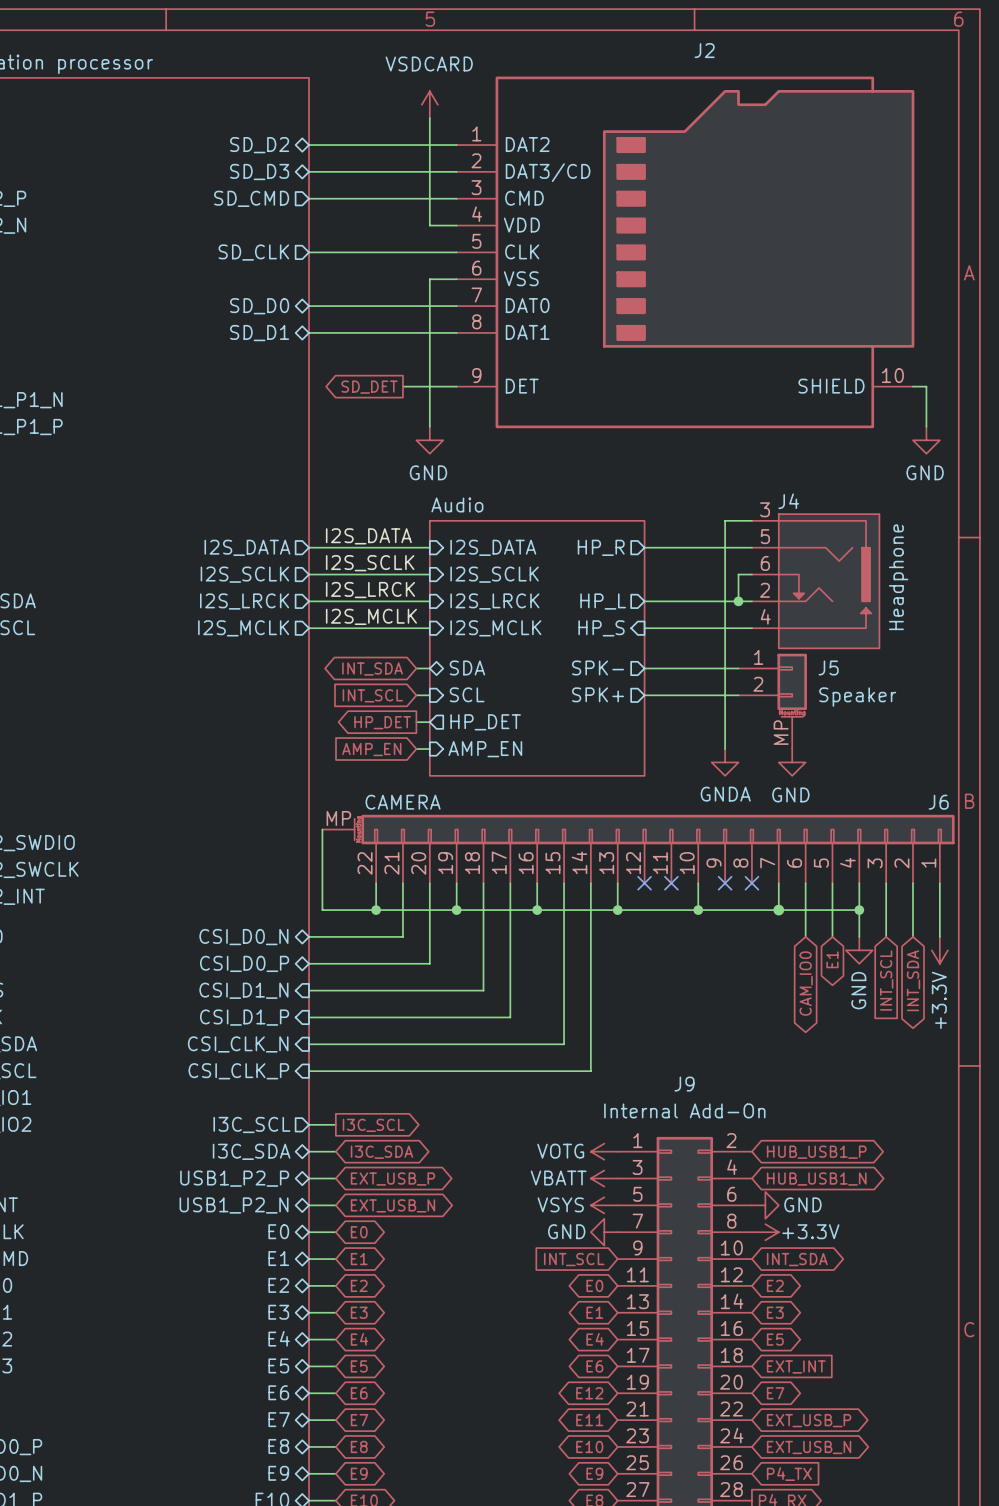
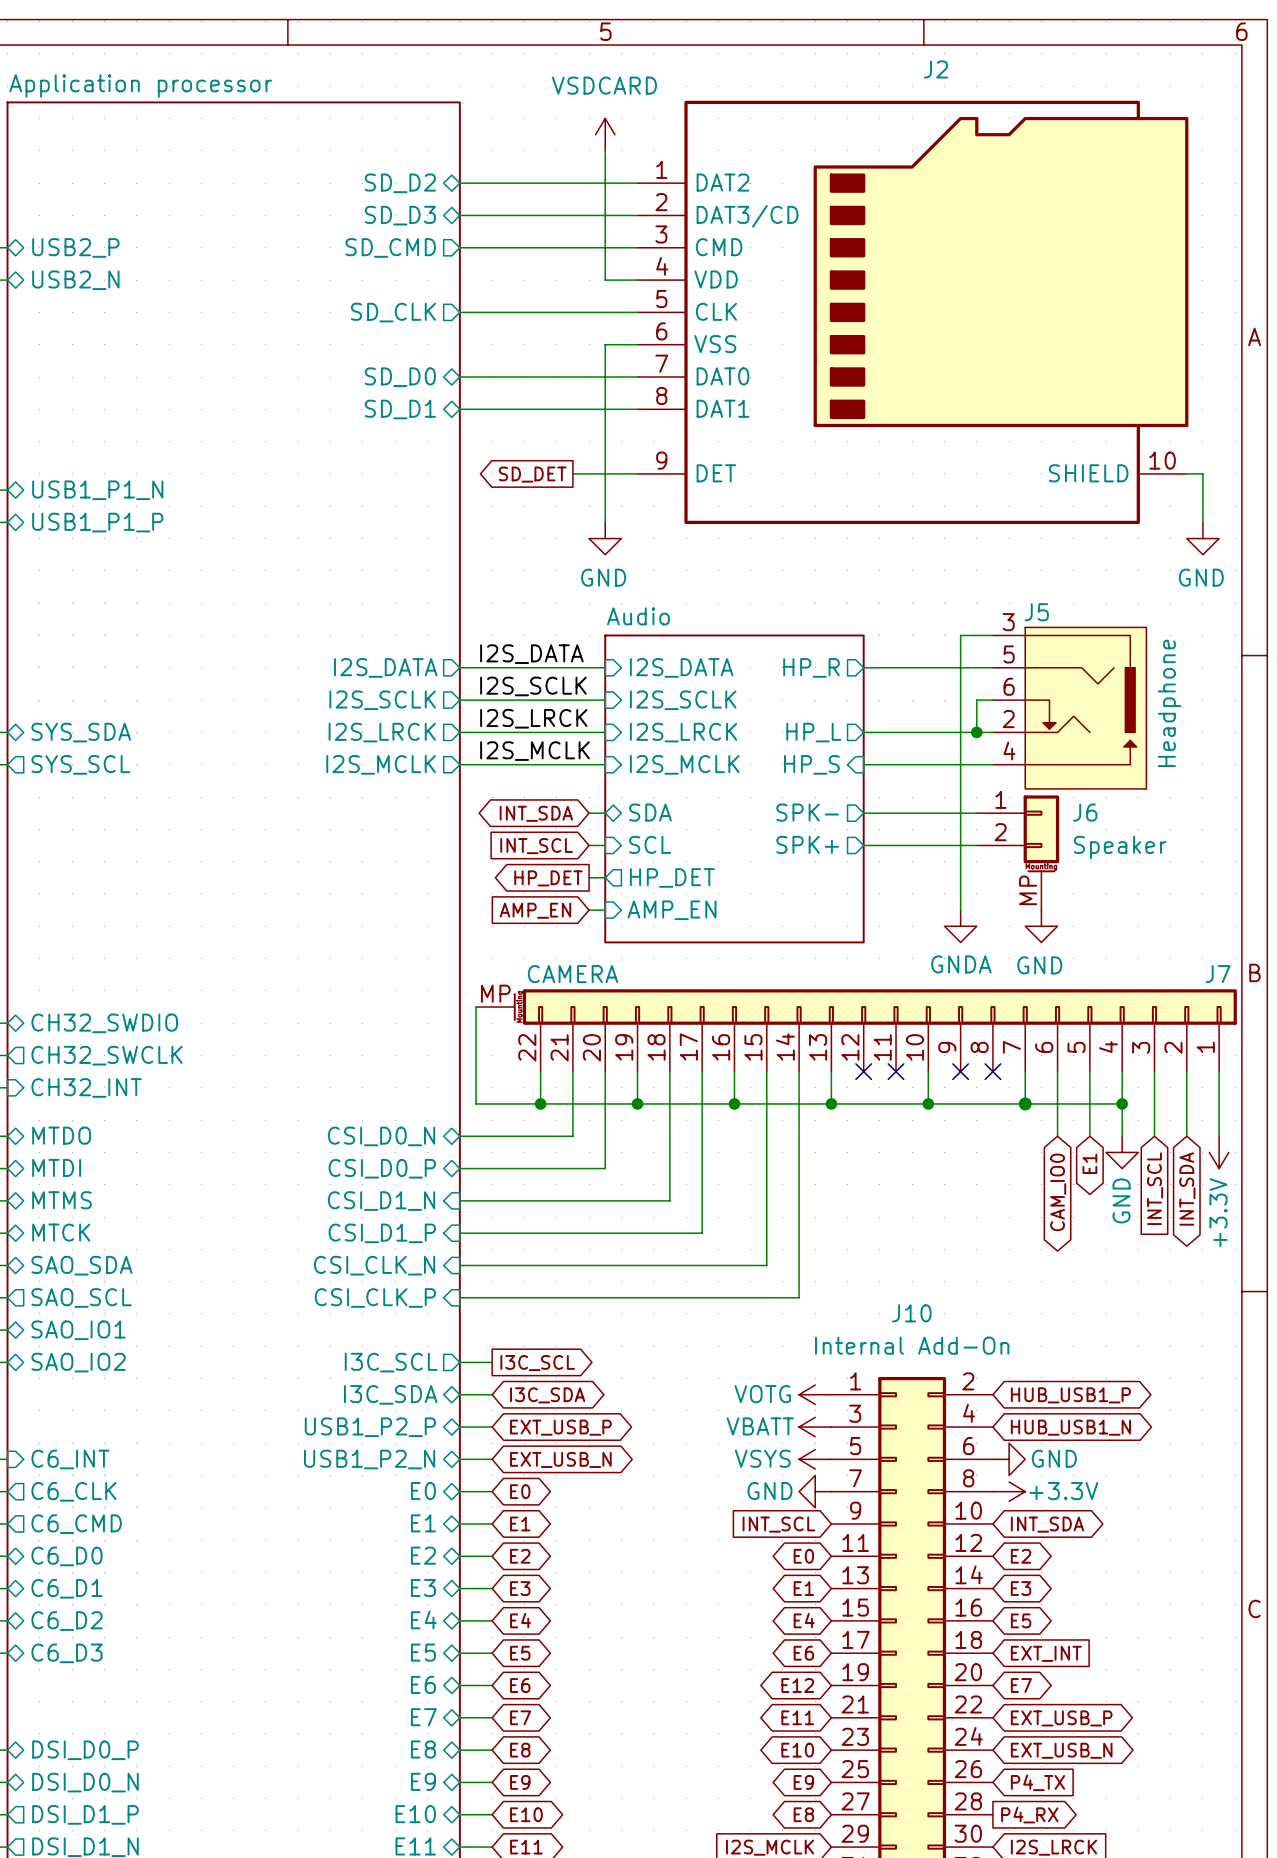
J4 name: J4 (788, 501) -> J5 (1036, 612)
J5 name: J5 (828, 667) -> J6 (1085, 812)
J6 name: J6 (938, 802) -> J7 (1218, 974)
J9 name: J9 (684, 1084) -> J10 (911, 1313)

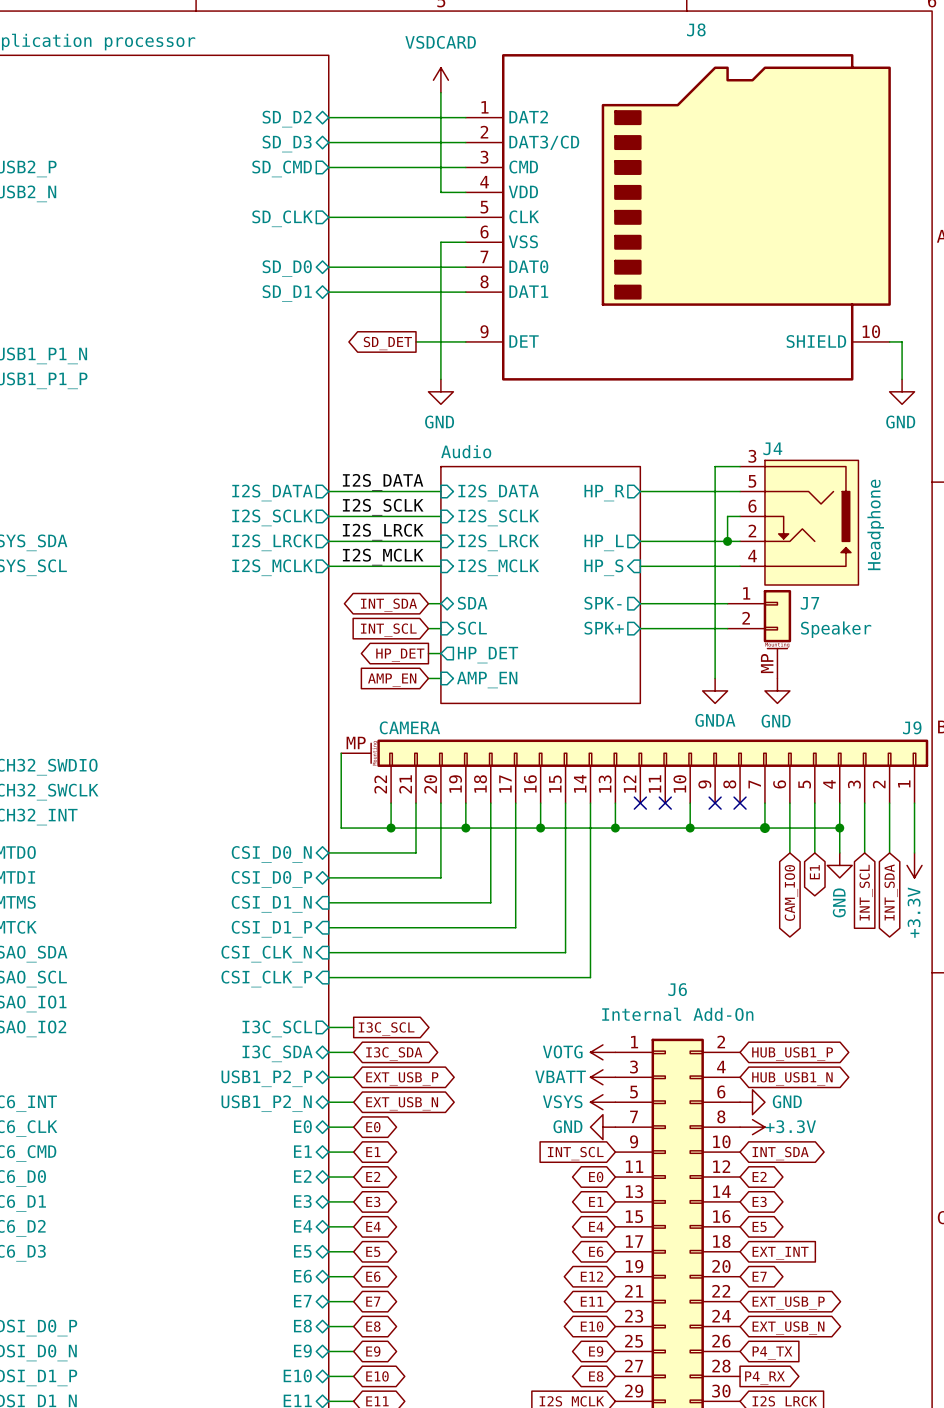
J2 name: J2 (936, 69) -> J8 (696, 29)
J5 name: J5 (1036, 612) -> J4 (772, 448)
J6 name: J6 (1085, 812) -> J7 (809, 603)
J7 name: J7 (1218, 974) -> J9 (912, 727)
J10 name: J10 (911, 1313) -> J6 (677, 989)

